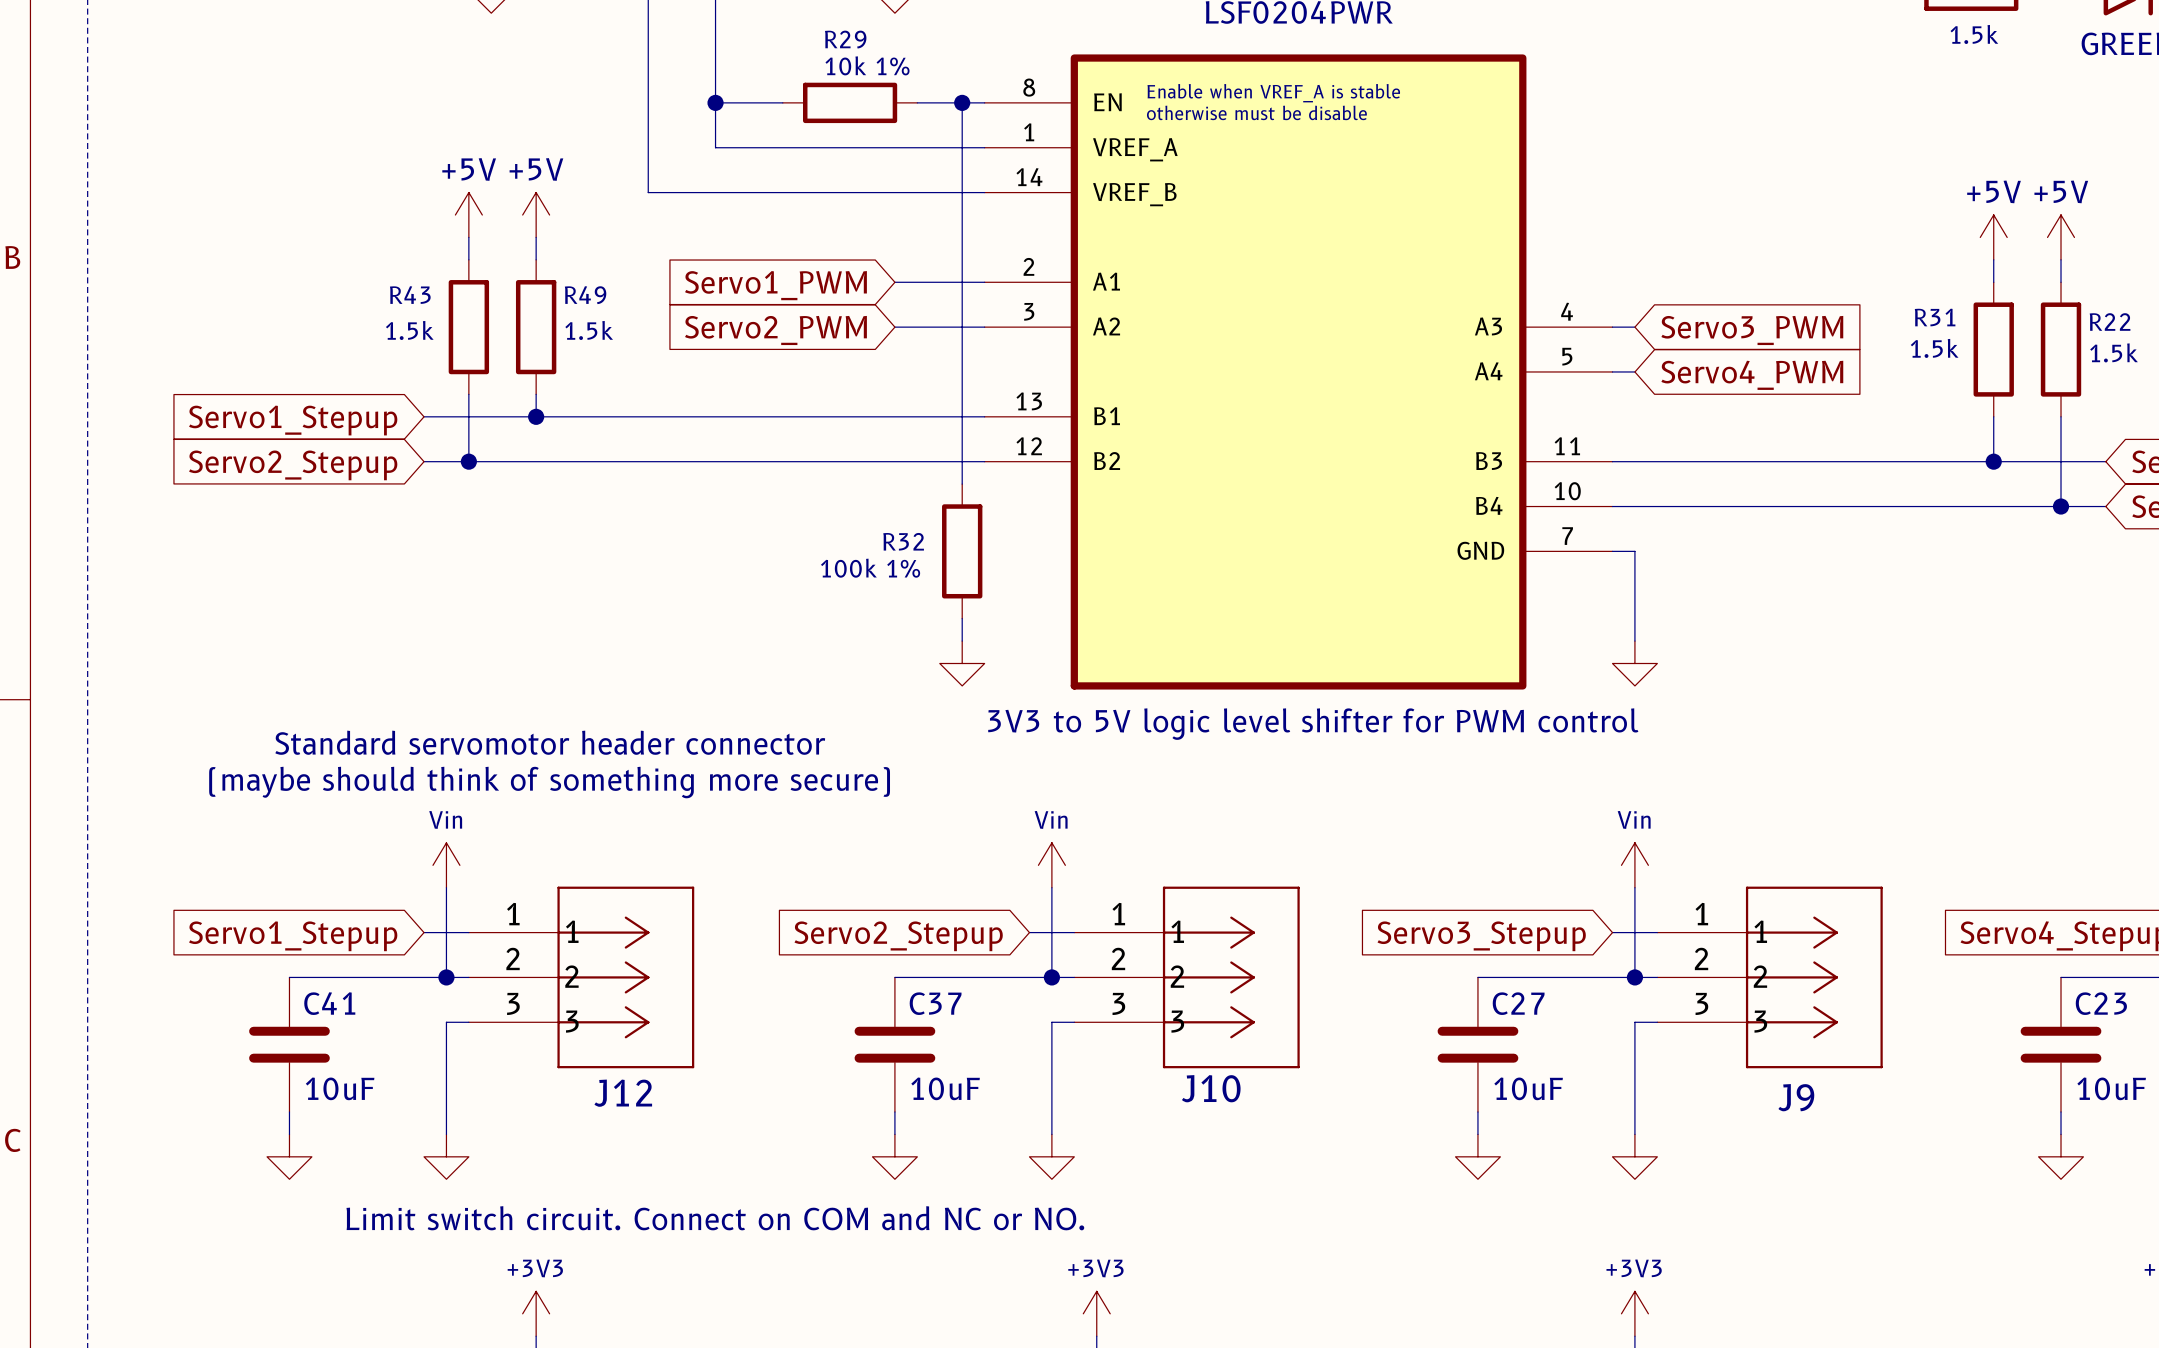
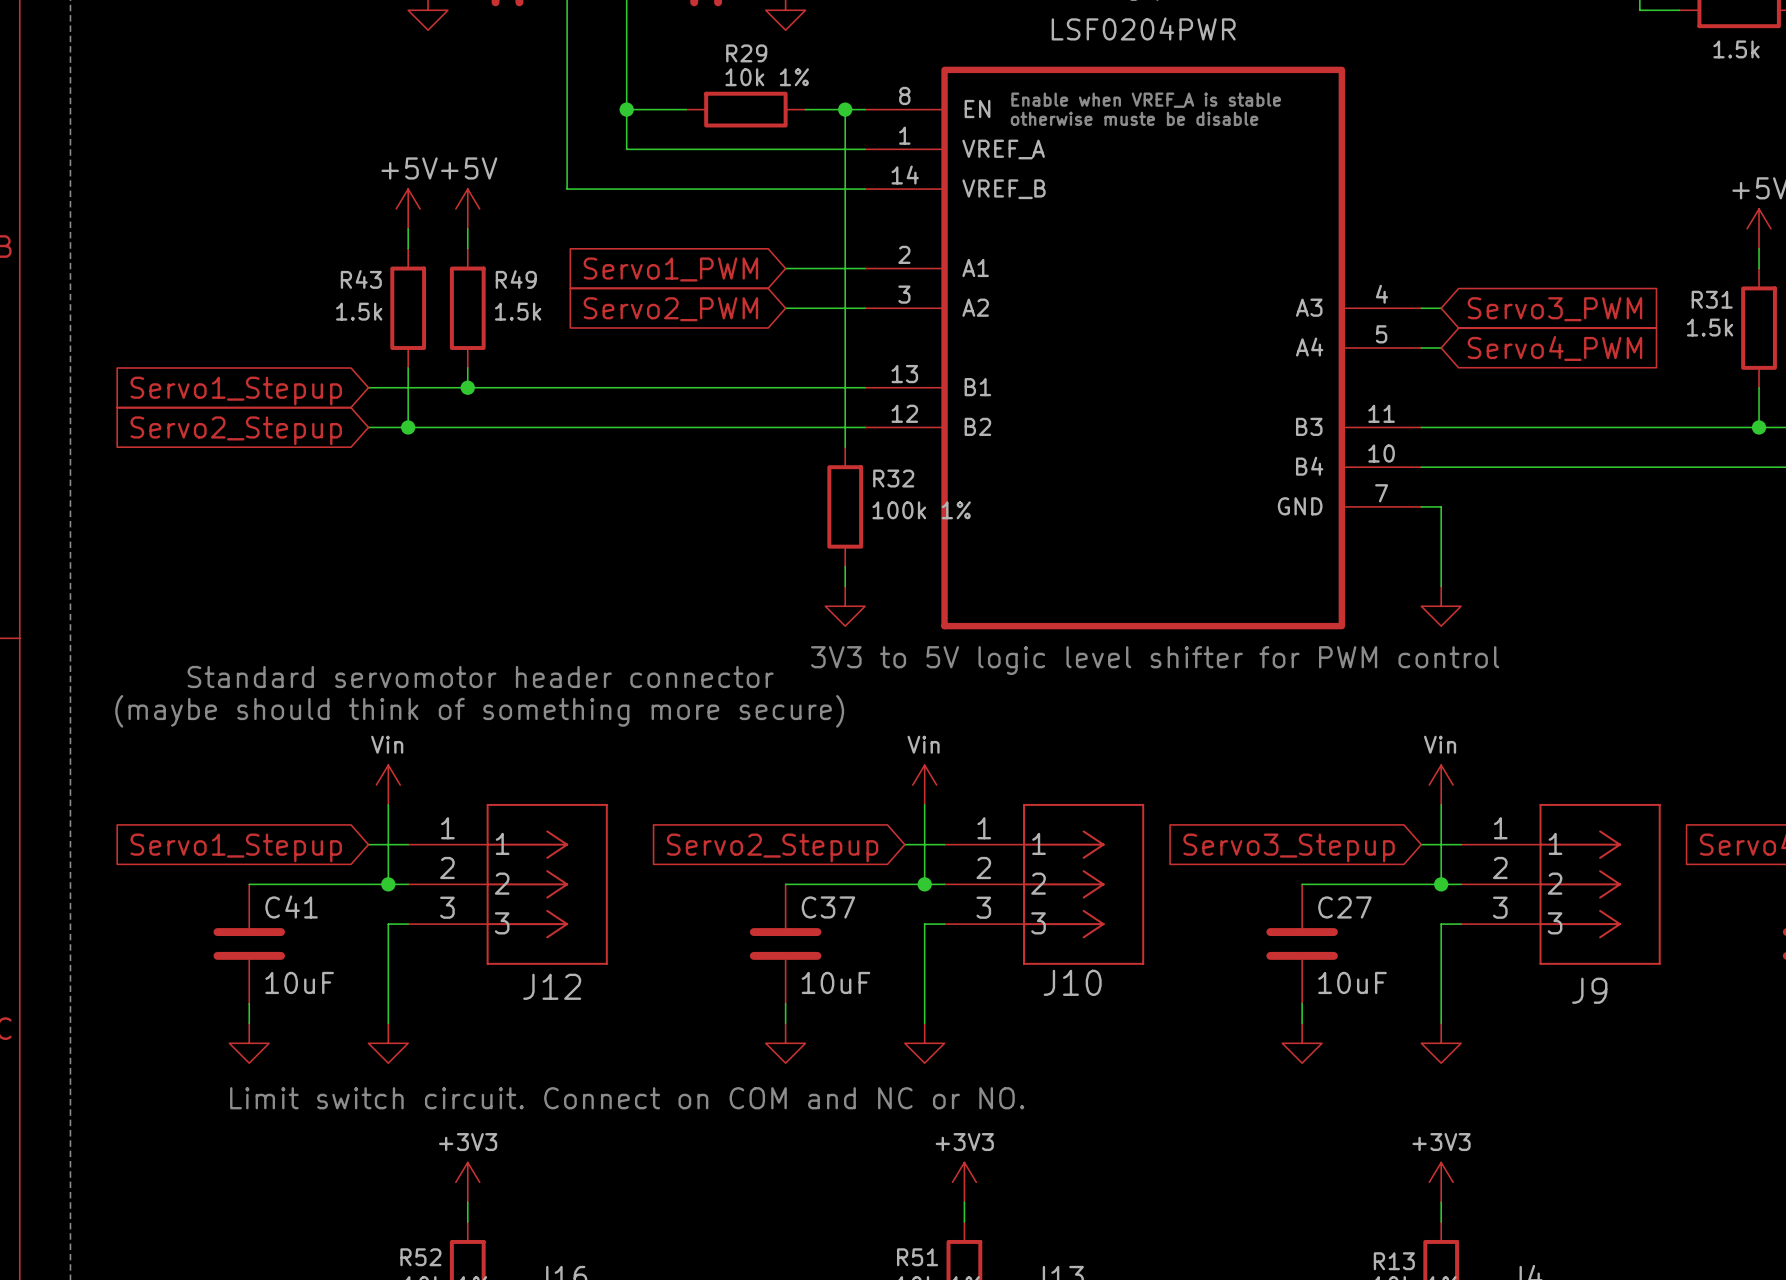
text: otherwise must be disable (1256, 112) -> otherwise muste be disable (1134, 118)
R32 name position: R32 (903, 541) -> R32 (893, 478)
R32 value position: 100k 1% (870, 568) -> 100k 1% (921, 510)

